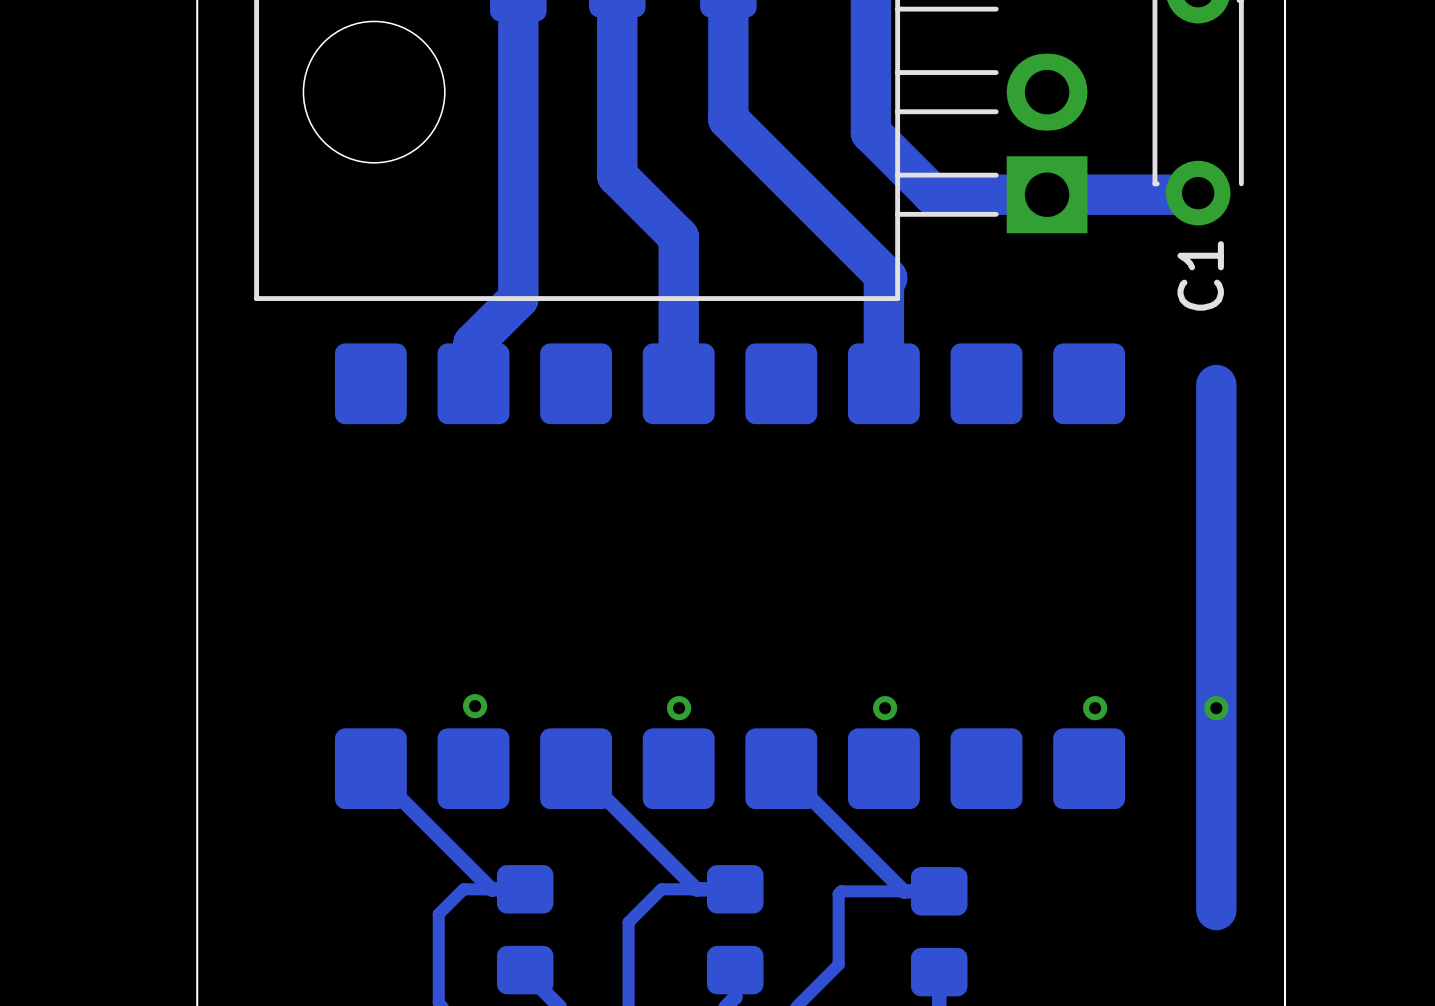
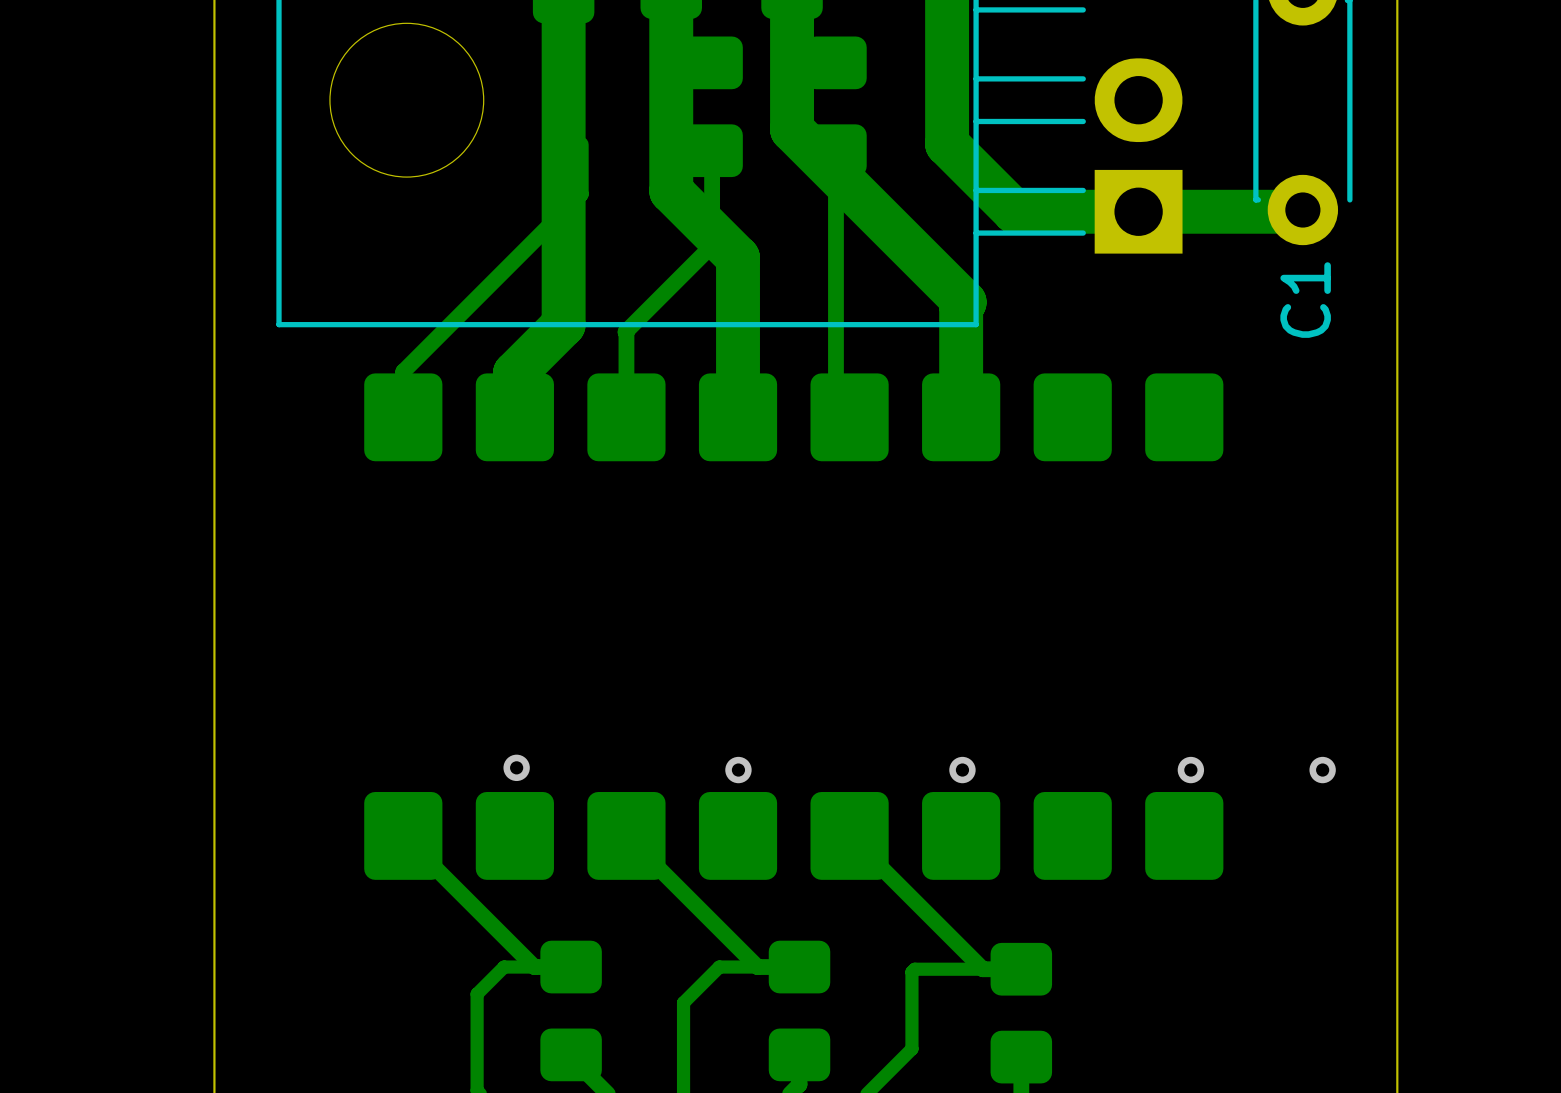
part: none -> (712, 106)
part: none -> (835, 106)
bottom track: none -> (580, 144) (580, 194) (403, 371) (403, 417)
bottom track: none -> (712, 150) (712, 245) (625, 332) (626, 417)
bottom track: none -> (835, 150) (835, 403) (849, 417)
bottom track: (1216, 384) (1216, 910) -> none

